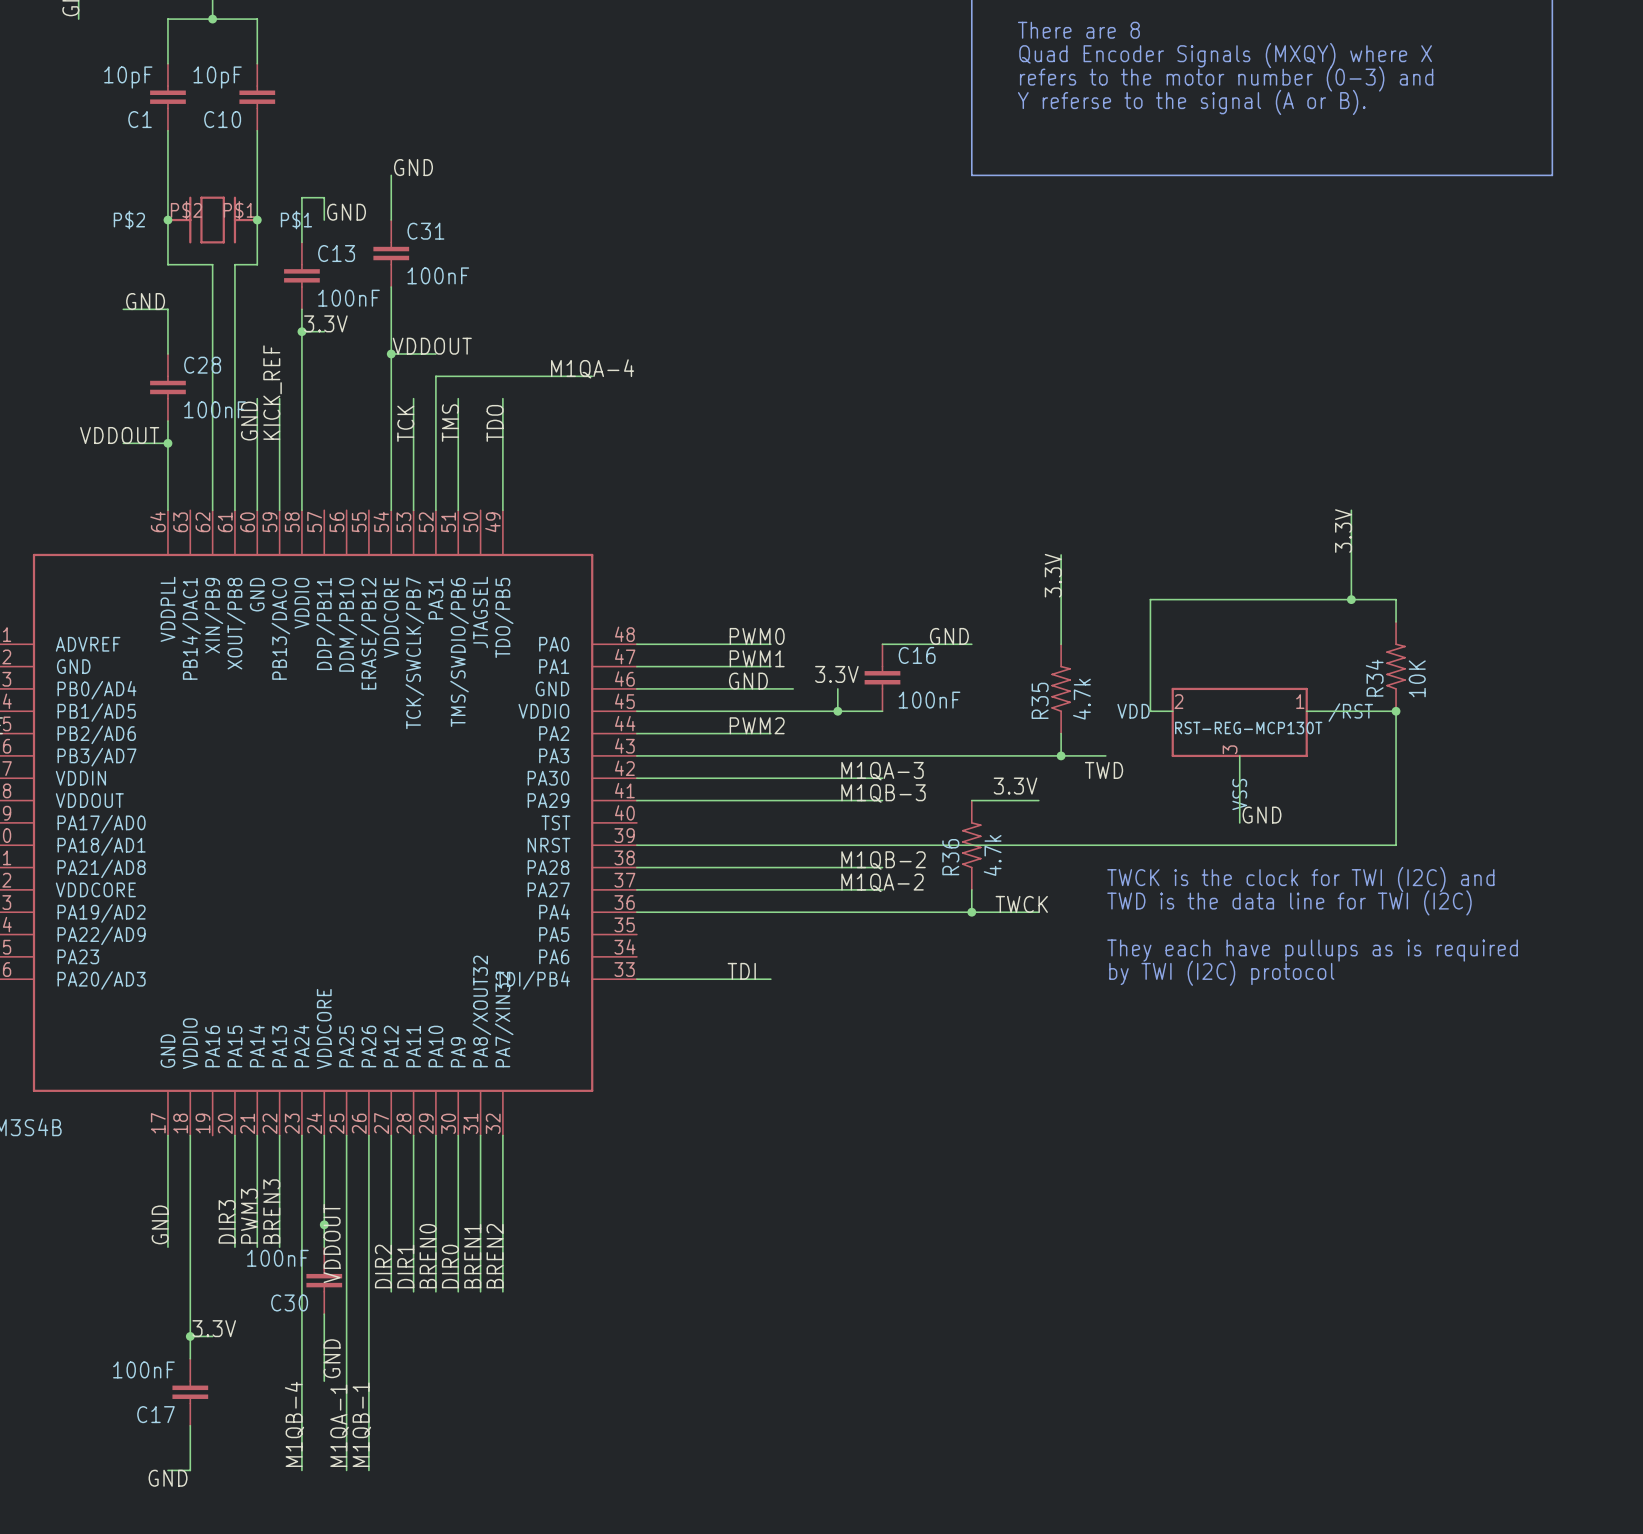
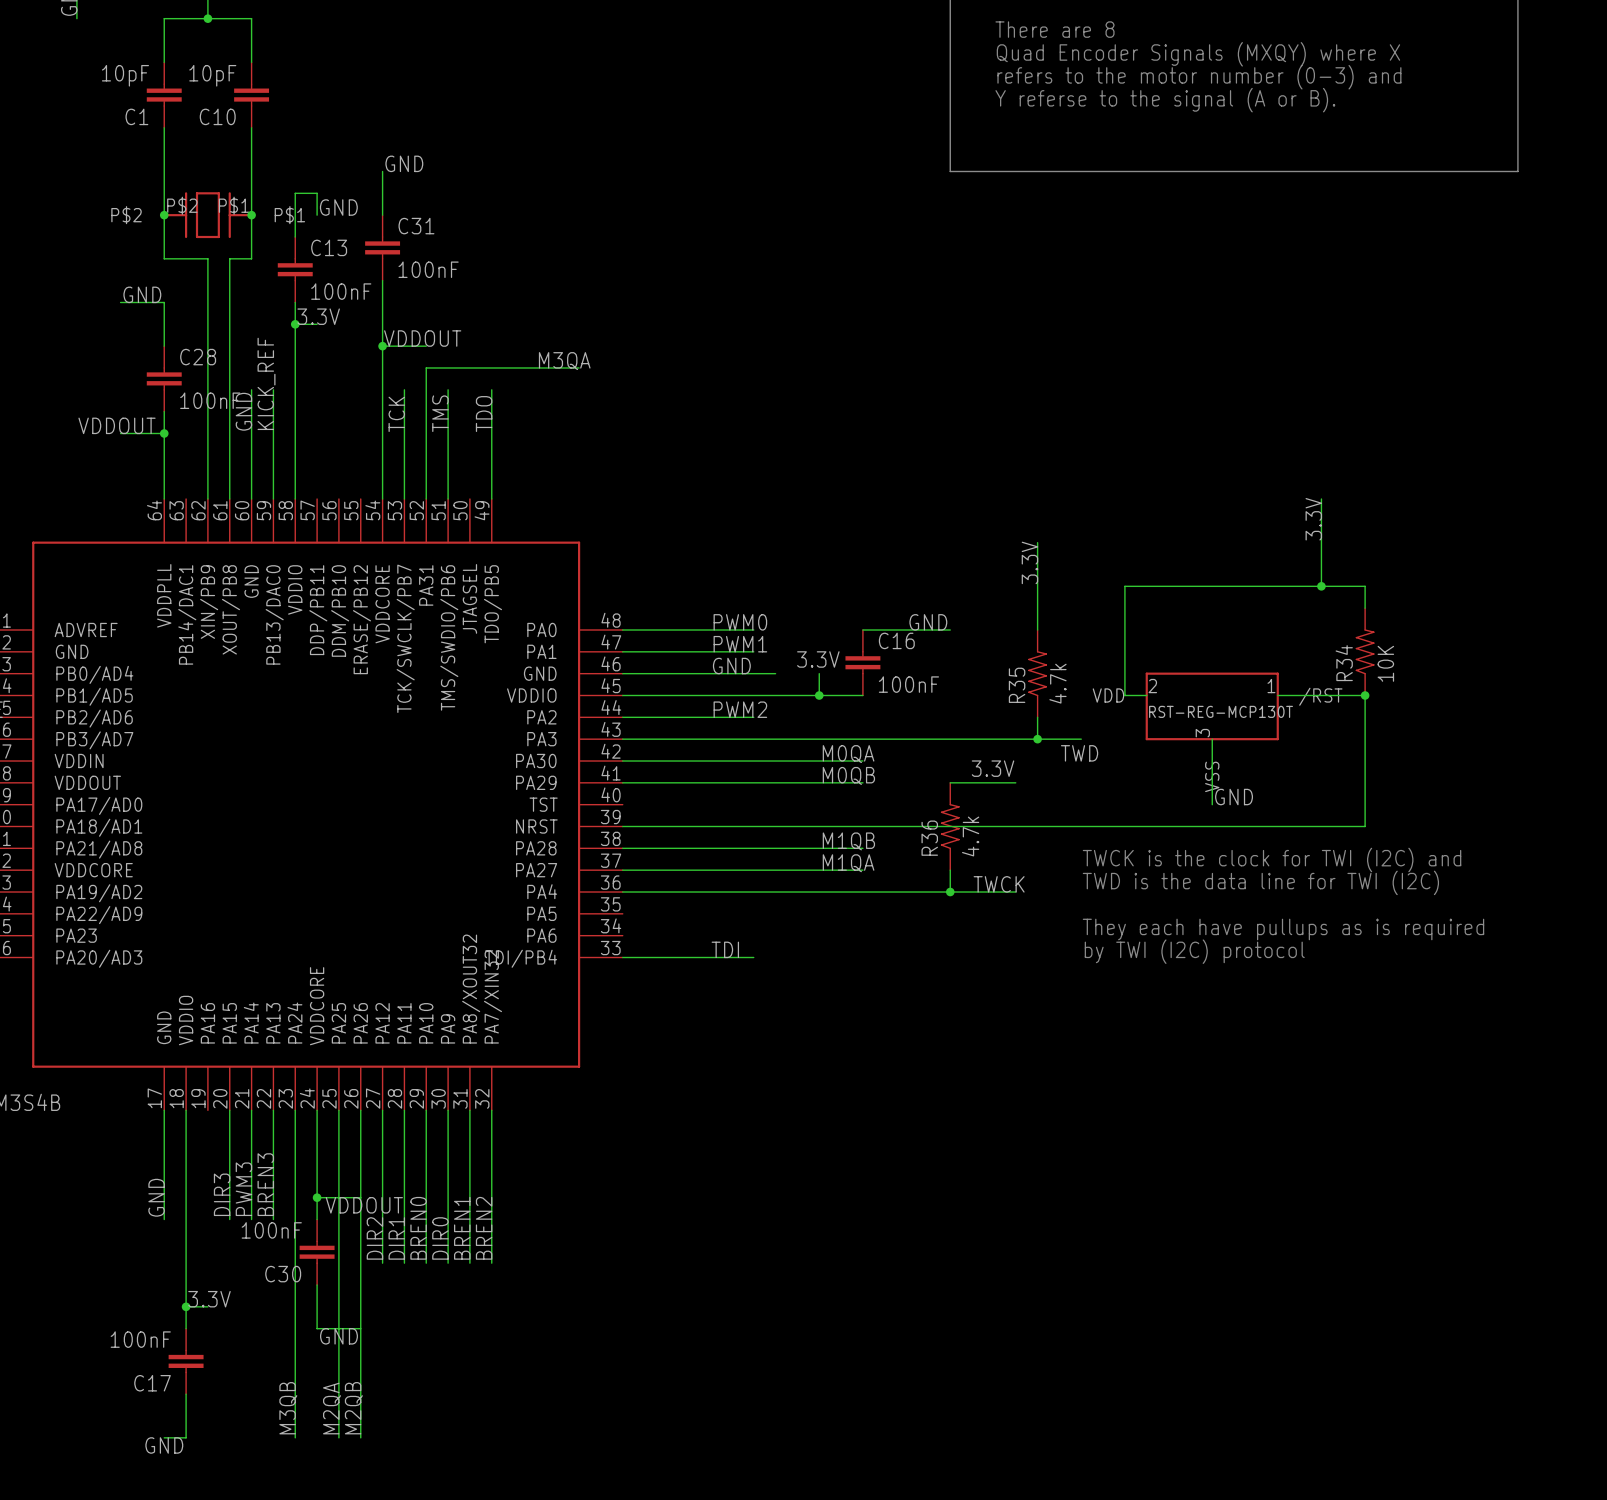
label: M1QA-4 (592, 368) -> M3QA (564, 361)
label: M1QA-3 (882, 771) -> M0QA (848, 754)
label: M1QB-3 (883, 793) -> M0QB (848, 775)
label: M1QB-2 (883, 860) -> M1QB (848, 841)
label: M1QA-2 (882, 882) -> M1QA (848, 863)
wire: none -> (317, 1197) (360, 1197)
label rotation: 0° (332, 1243) -> 90° clockwise (364, 1205)
wire: (324, 1358) (324, 1381) -> (317, 1328) (360, 1328)
label rotation: 0° (332, 1358) -> 90° clockwise (338, 1336)
label: M1QB-4 (294, 1424) -> M3QB (288, 1408)
label: M1QB-1 (361, 1424) -> M2QB (353, 1408)
label: M1QA-1 (339, 1425) -> M2QA (332, 1408)

